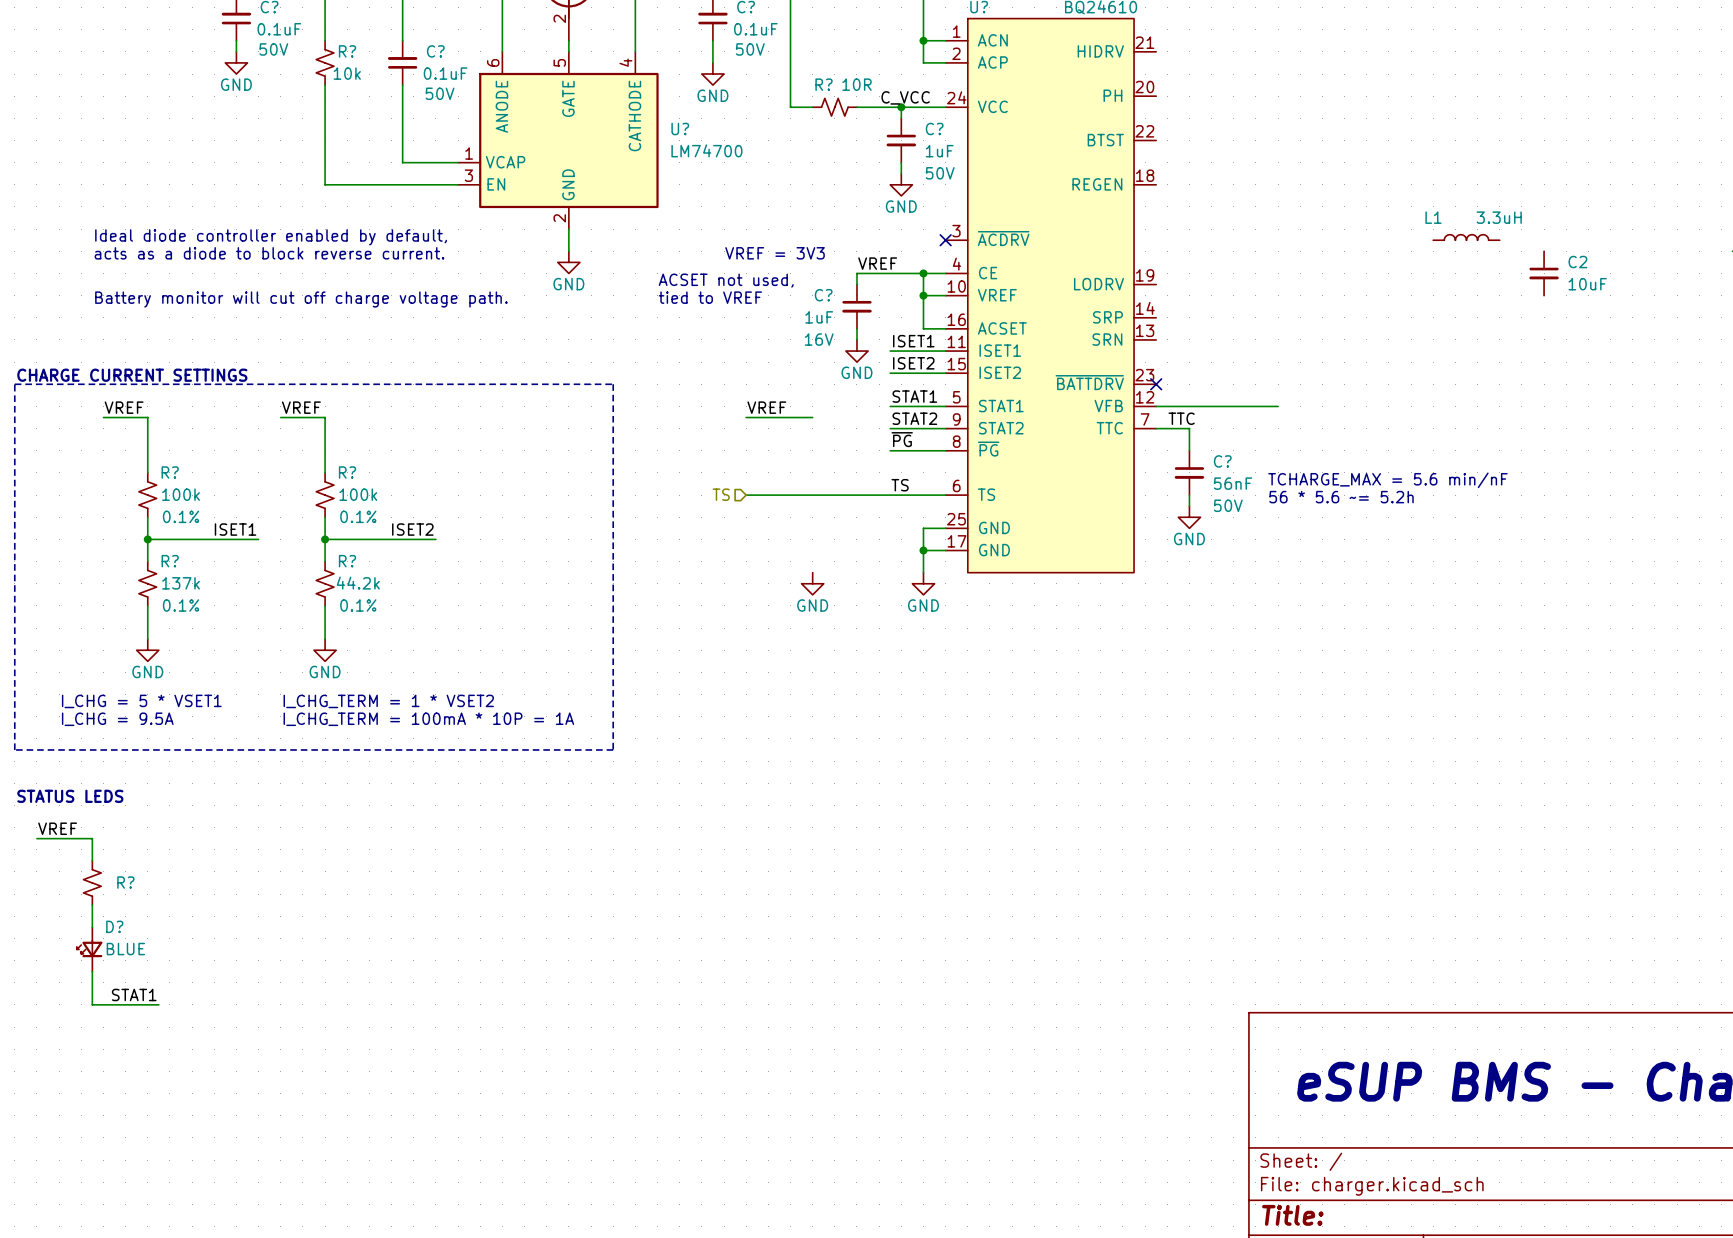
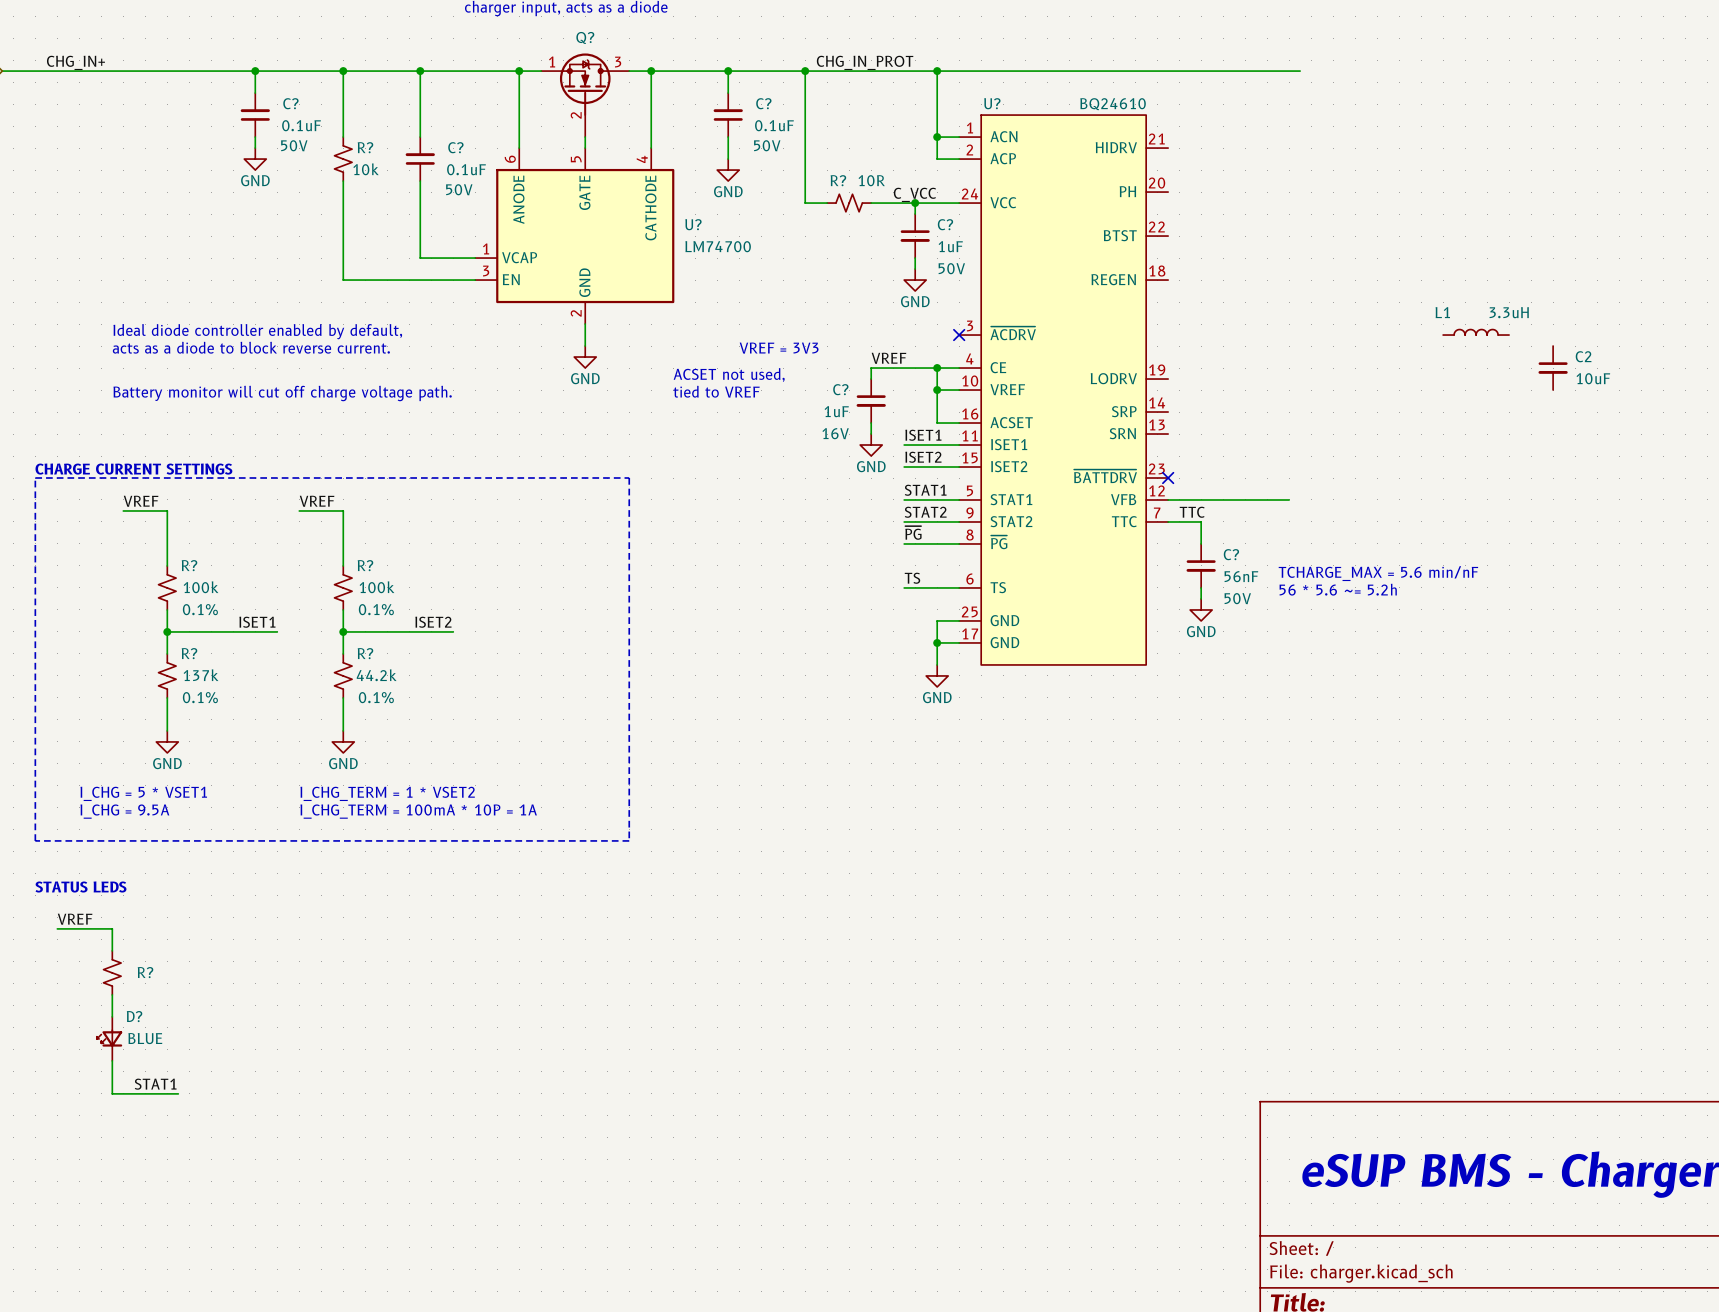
label: VREF (766, 407) -> none
wire: (746, 417) (812, 417) -> none
hierarchical label: TS (721, 494) -> none
wire: (746, 495) (890, 495) -> none
power symbol: GND (812, 583) -> none

